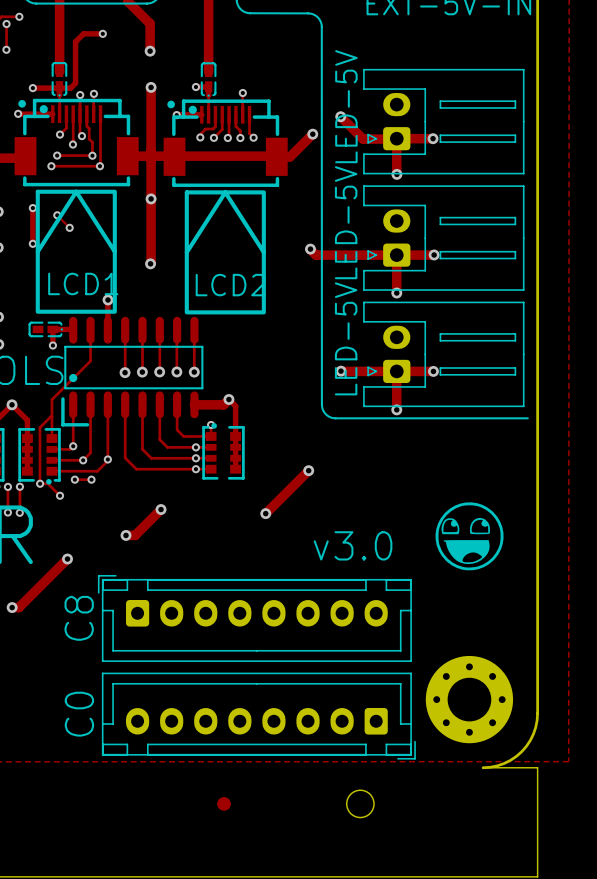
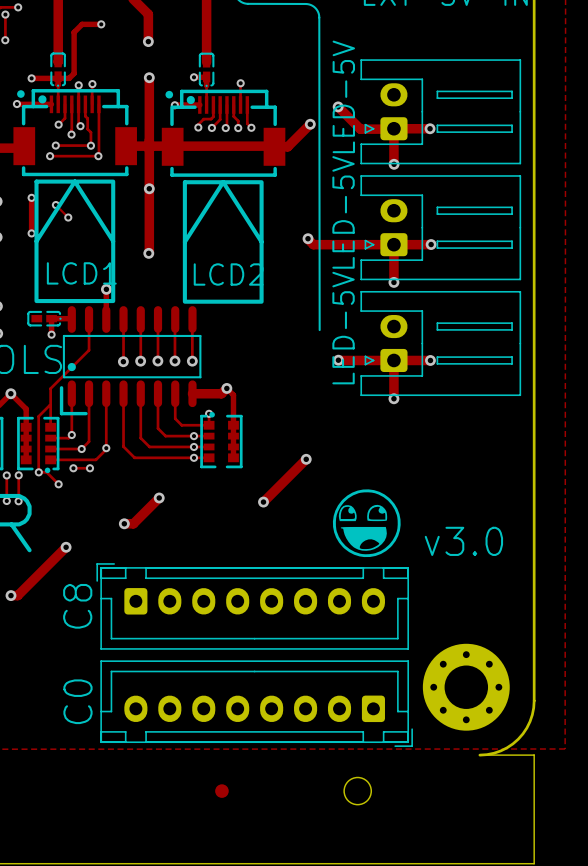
line: (321, 27) (321, 404) (323, 411) (328, 416) (335, 418) (527, 418) -> (319, 17) (319, 330)
drawing position: (469, 536) -> (366, 523)
text position: v3.0 (353, 545) -> v3.0 (463, 541)

